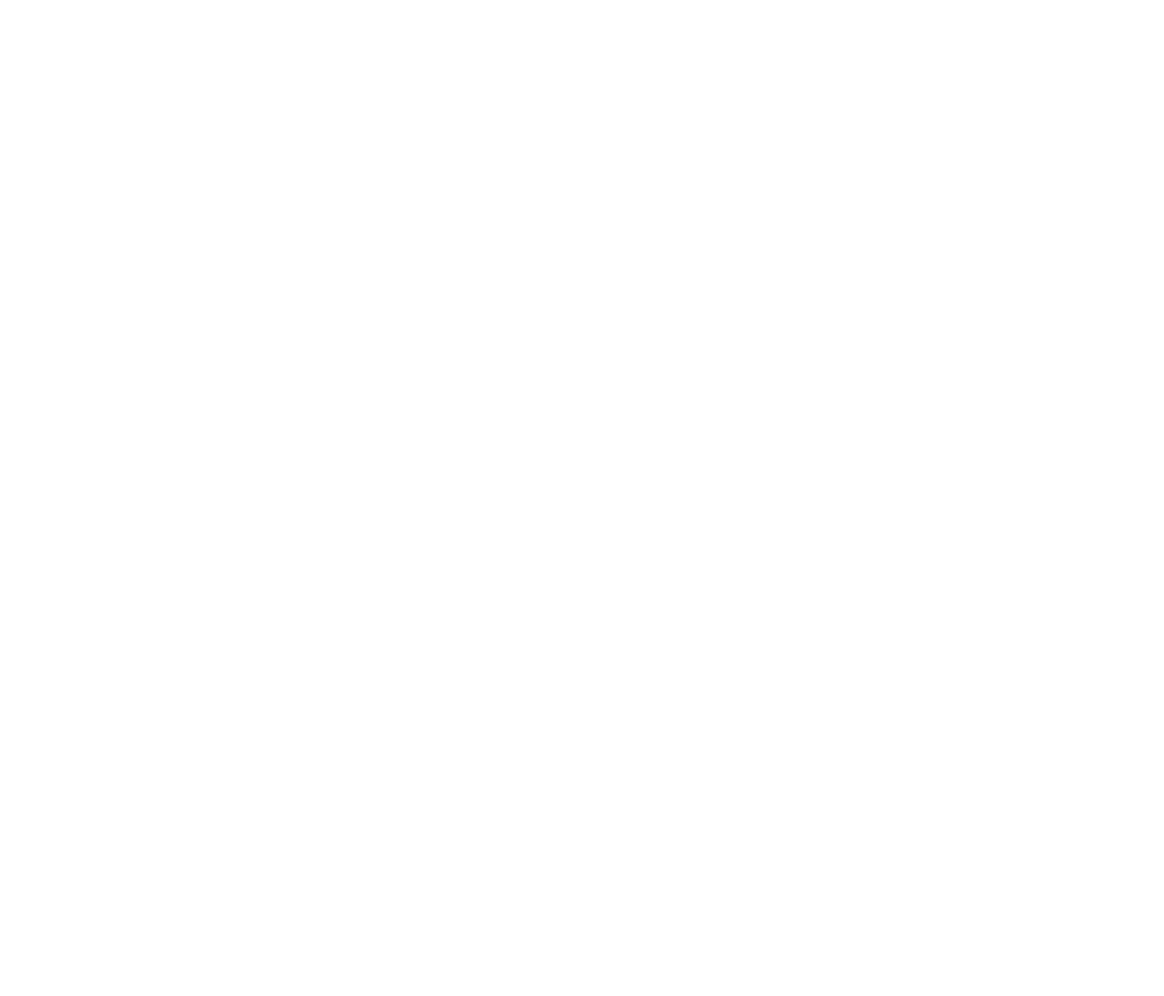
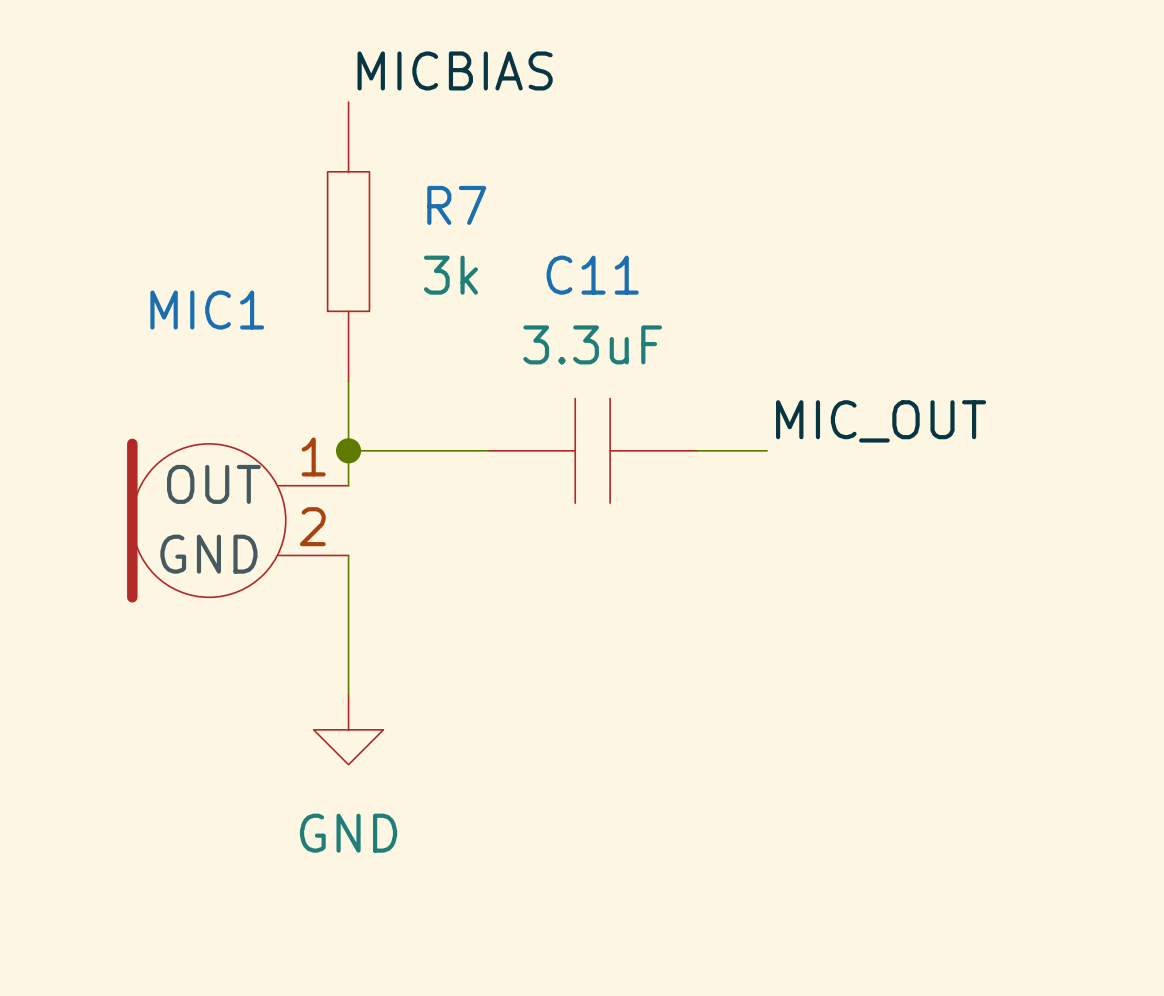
label: none -> MICBIAS (455, 70)
R7: none -> 3k (348, 241)
wire: none -> (348, 381) (348, 485)
label: none -> MIC_OUT (881, 421)
wire: none -> (348, 450) (488, 450)
junction: none -> (348, 450)
C11: none -> 3.3uF (592, 450)
wire: none -> (697, 450) (767, 450)
MIC1: none -> (237, 520)
wire: none -> (348, 555) (348, 694)
power symbol: none -> GND (348, 729)

